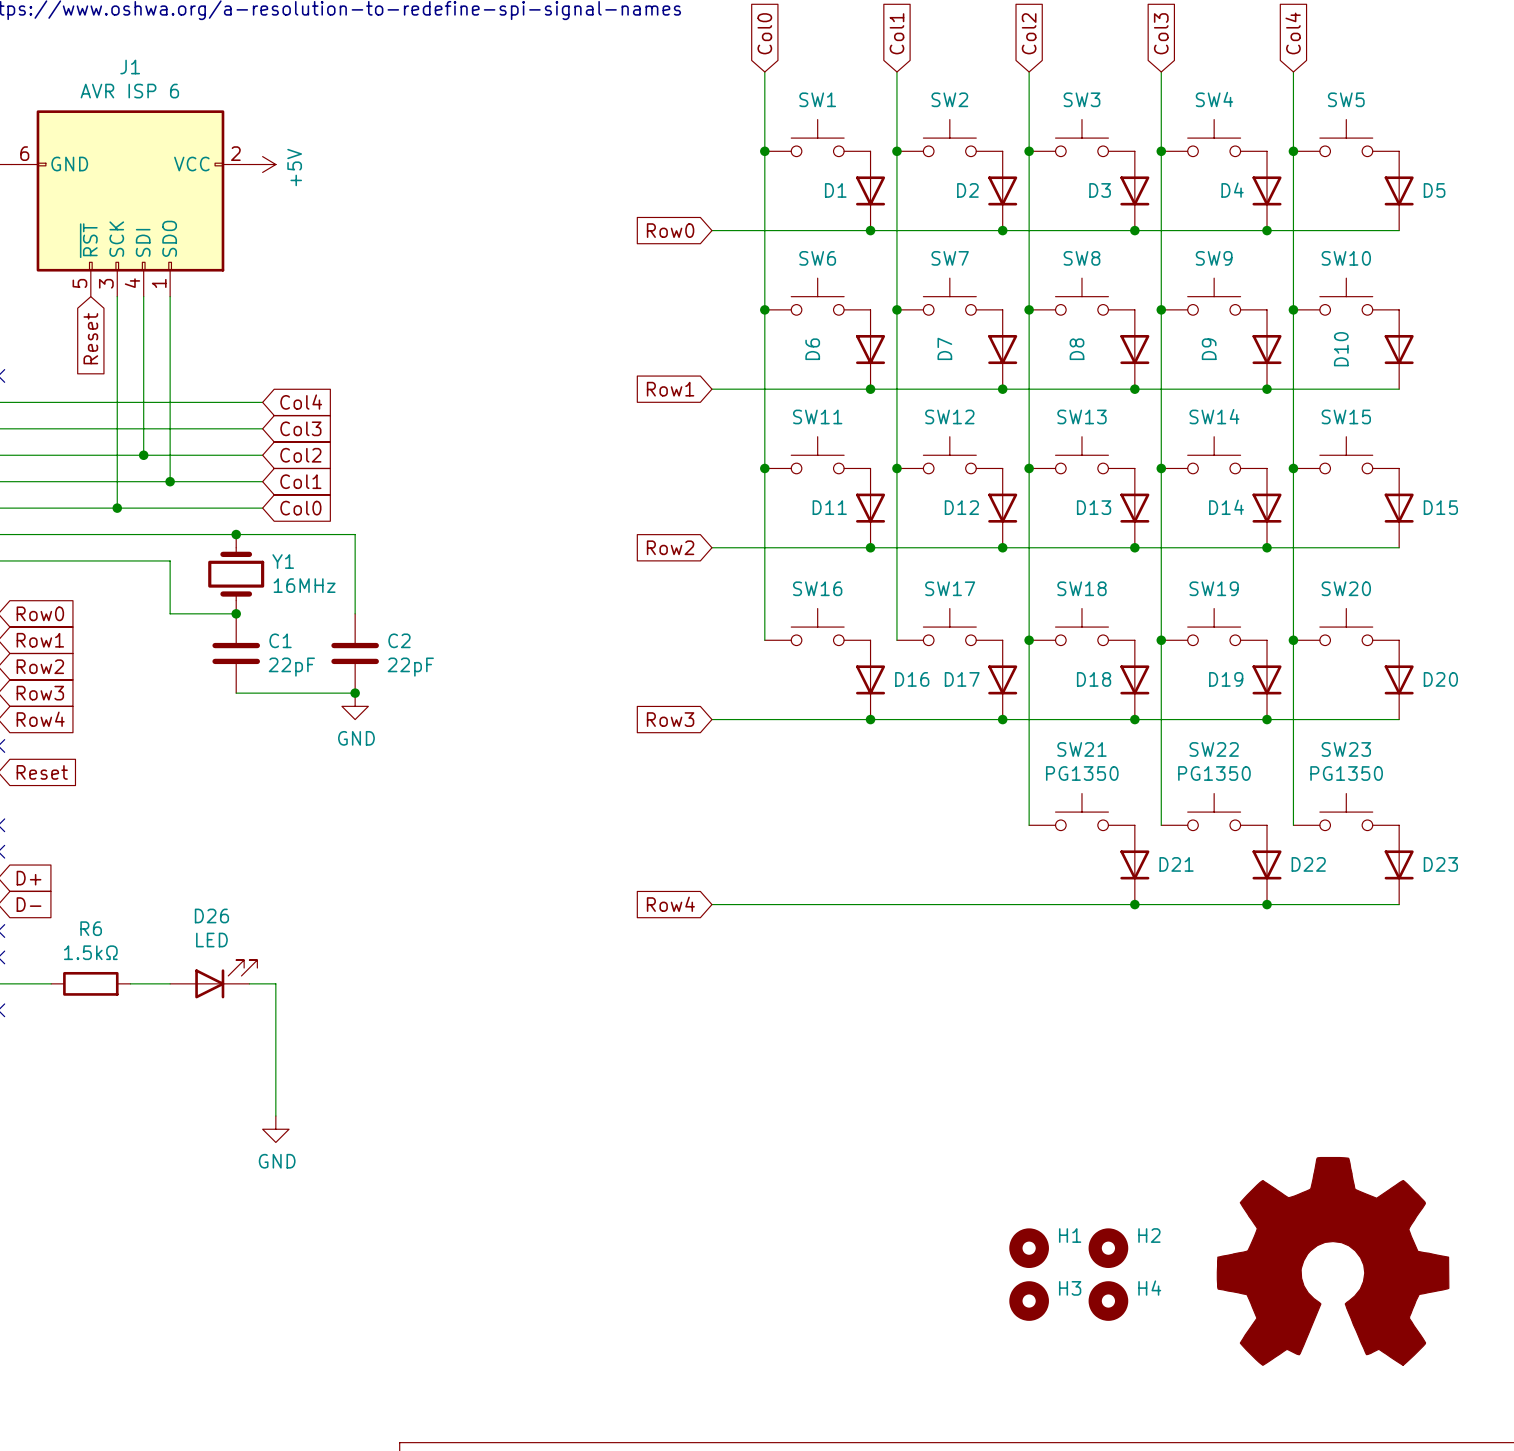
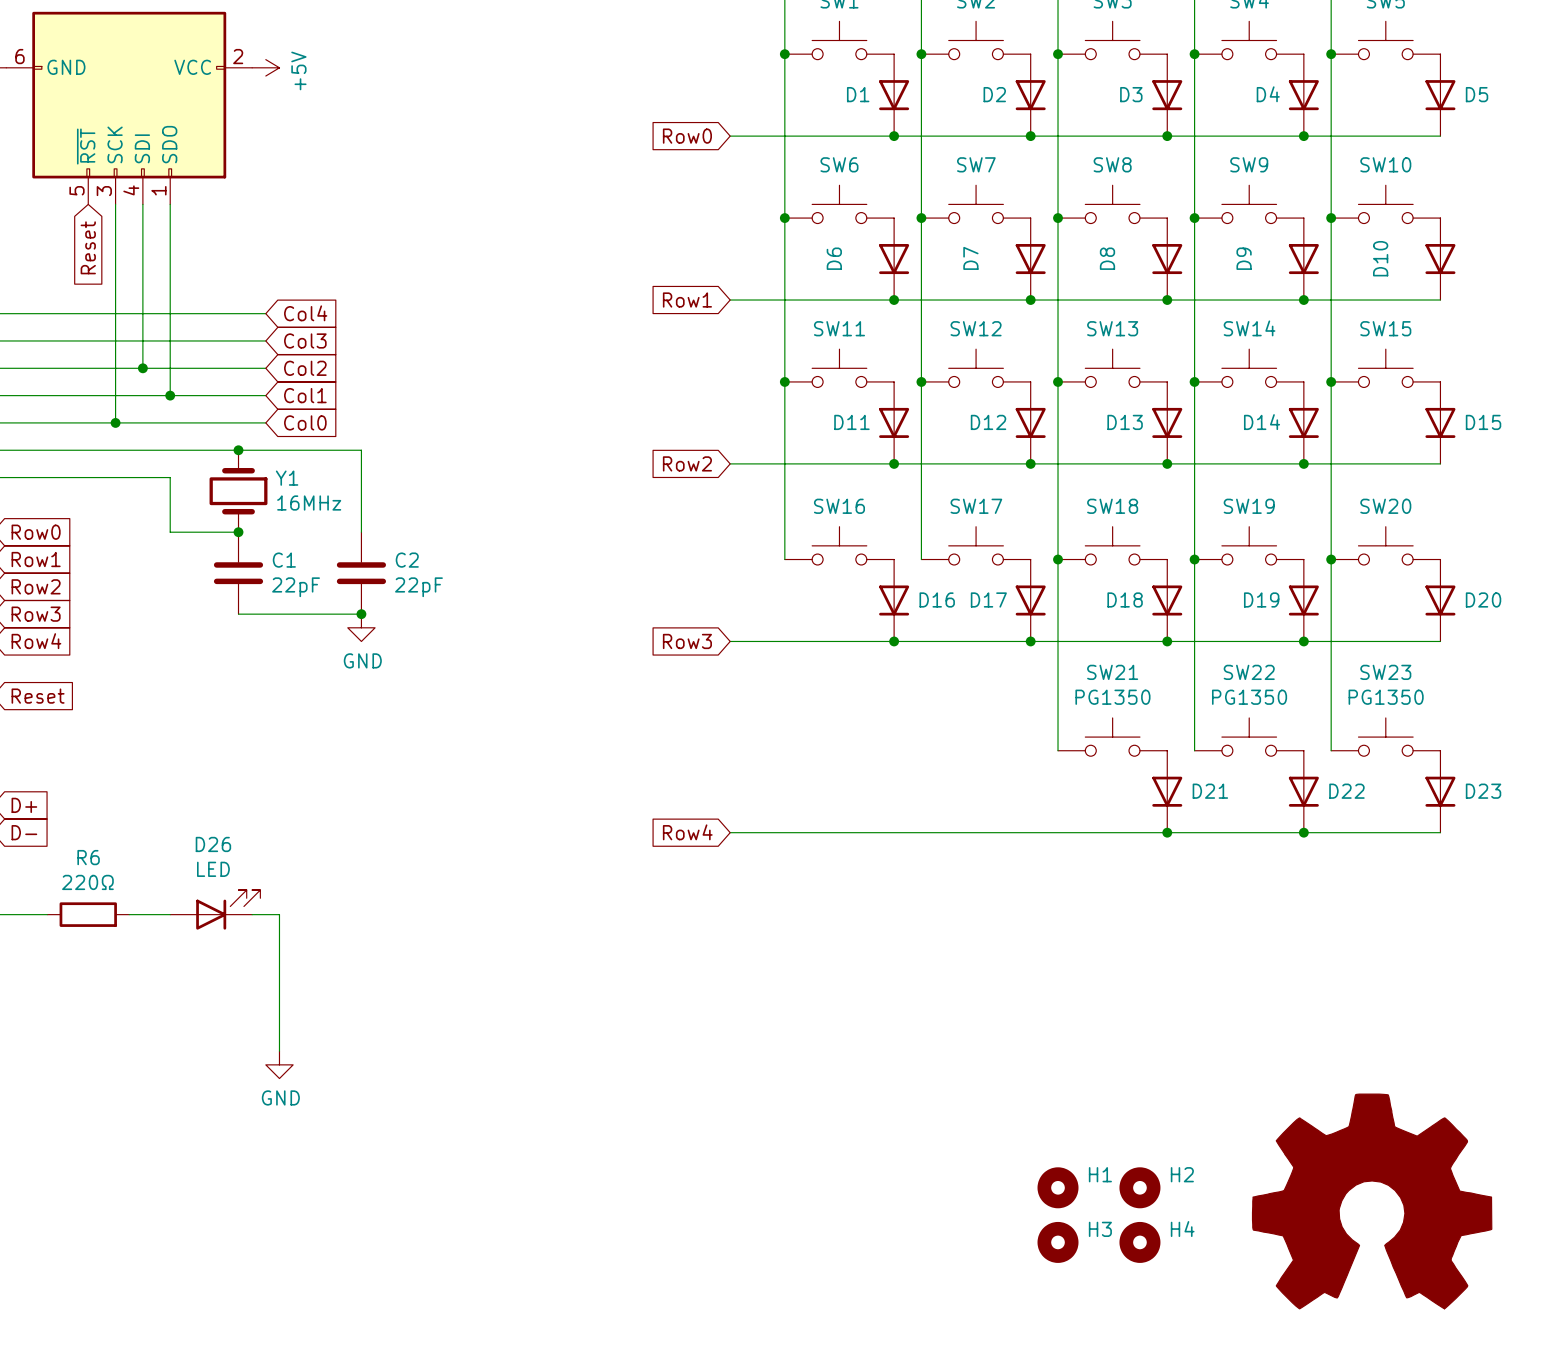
R6 value: 1.5kΩ (90, 952) -> 220Ω (87, 882)

